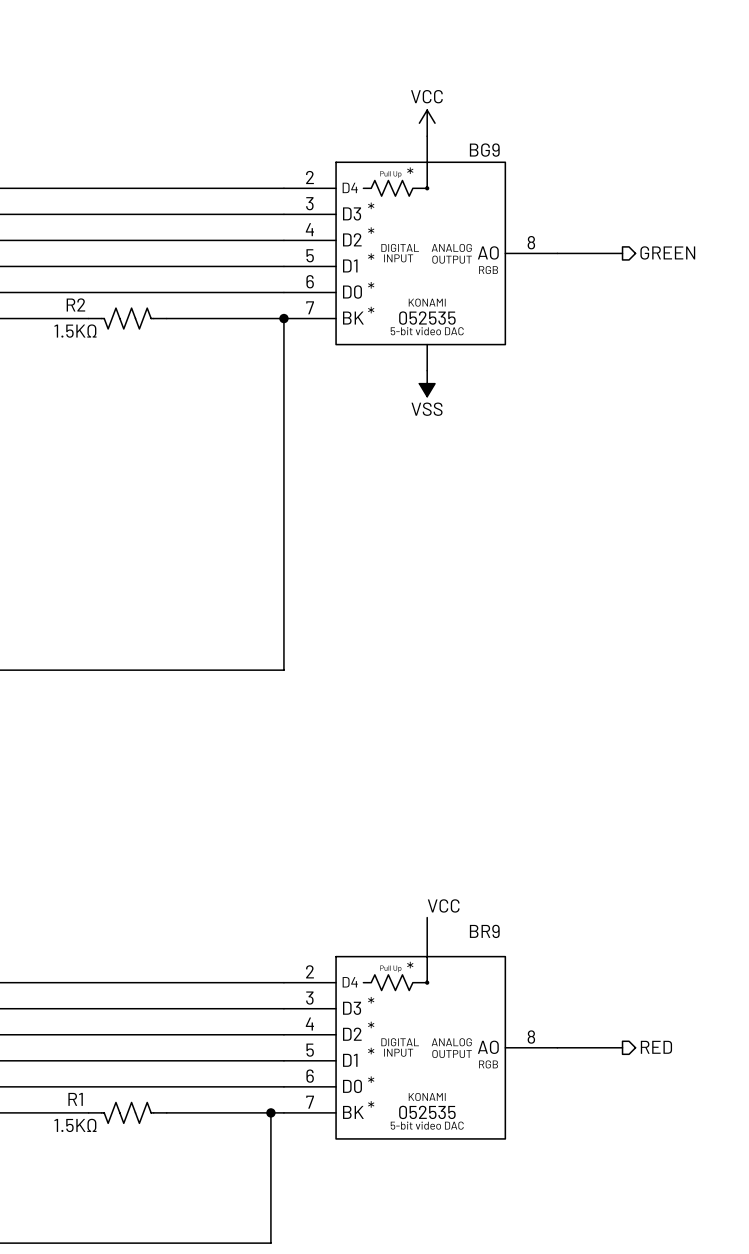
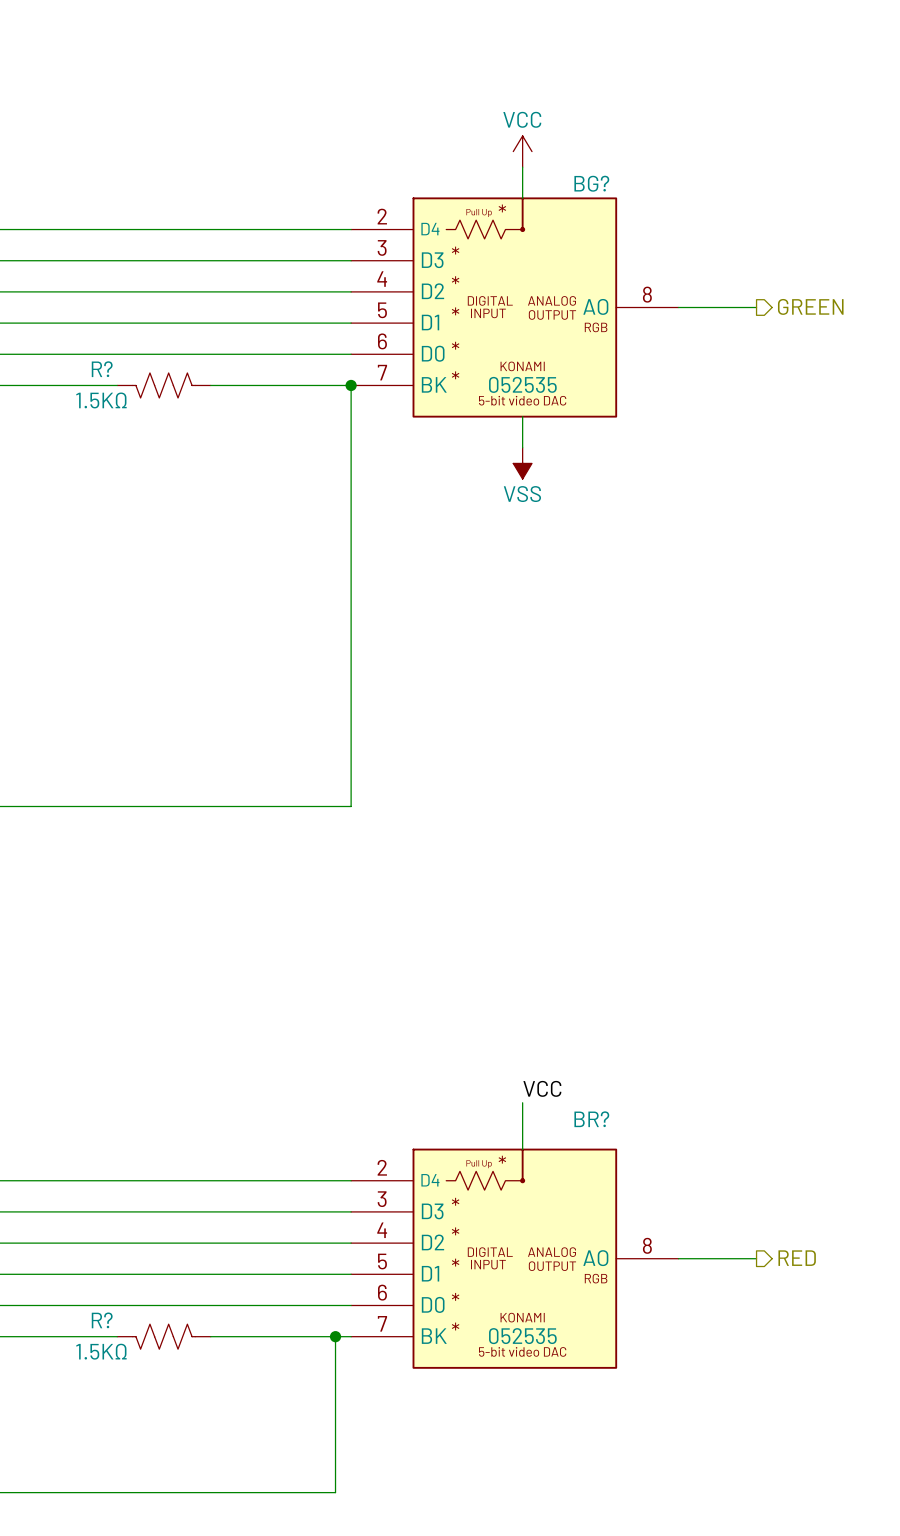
BG9 name: BG9 (484, 150) -> BG? (591, 183)
R2 name: R2 (75, 304) -> R? (102, 369)
BR9 name: BR9 (484, 931) -> BR? (591, 1119)
R1 name: R1 (75, 1099) -> R? (102, 1320)

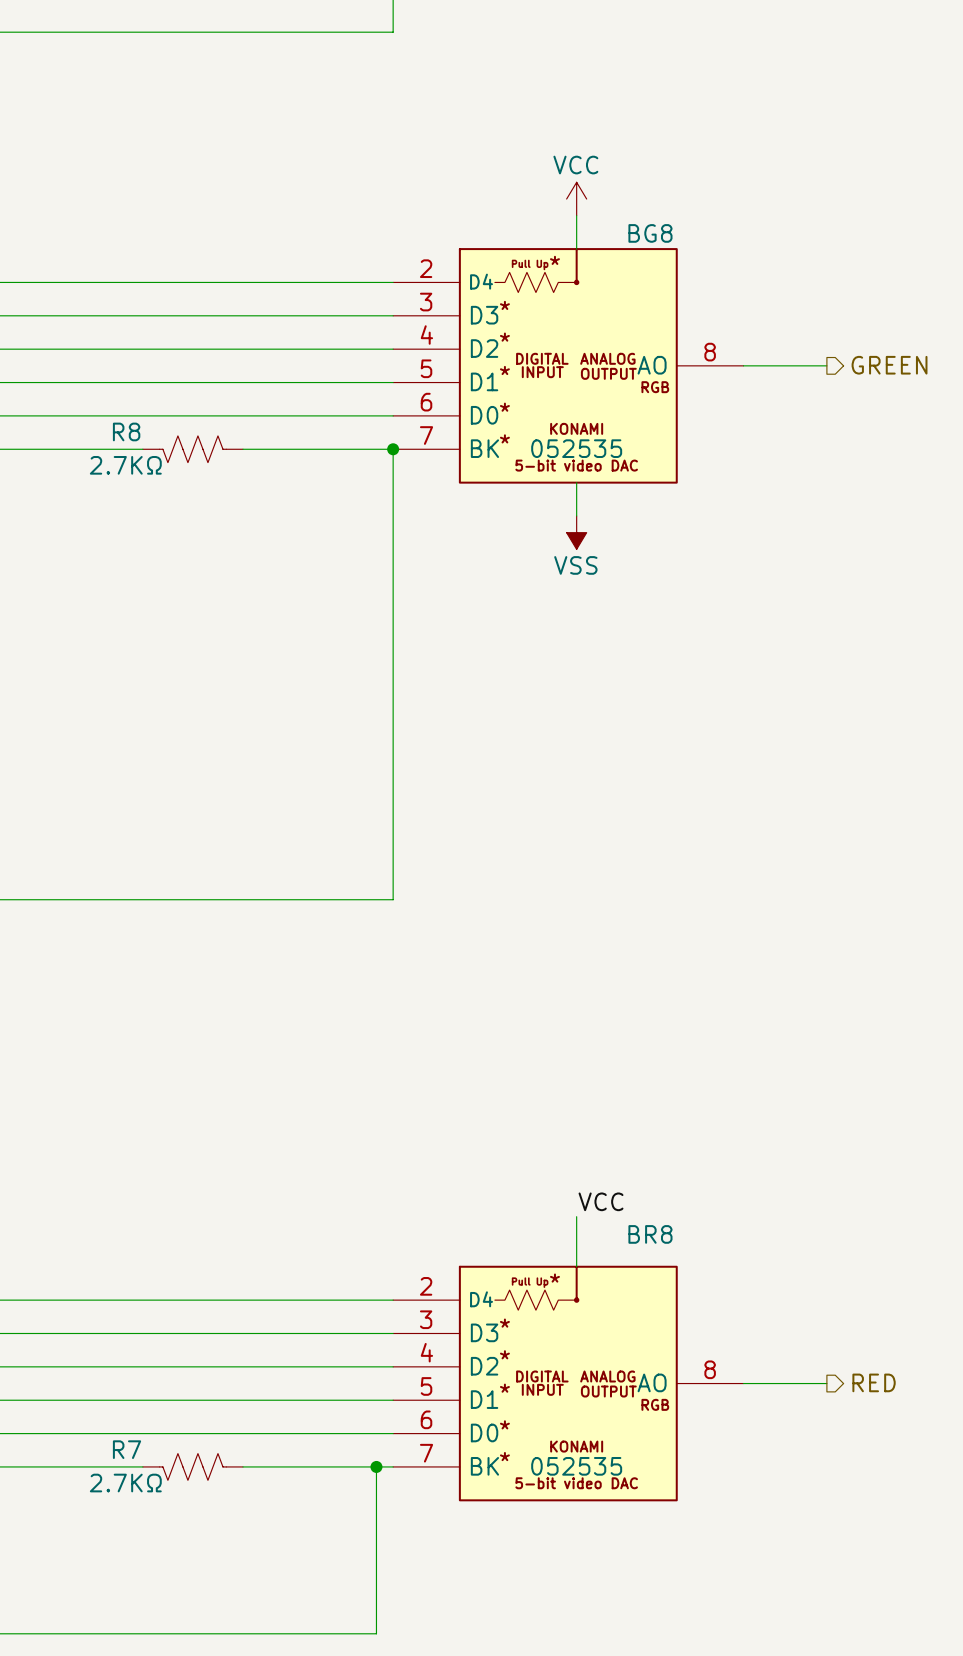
BG? name: BG? (591, 183) -> BG8 (650, 233)
R? name: R? (102, 369) -> R8 (126, 431)
R? value: 1.5KΩ (101, 400) -> 2.7KΩ (125, 465)
BR? name: BR? (591, 1119) -> BR8 (650, 1234)
R? name: R? (102, 1320) -> R7 (127, 1449)
R? value: 1.5KΩ (101, 1351) -> 2.7KΩ (125, 1483)

